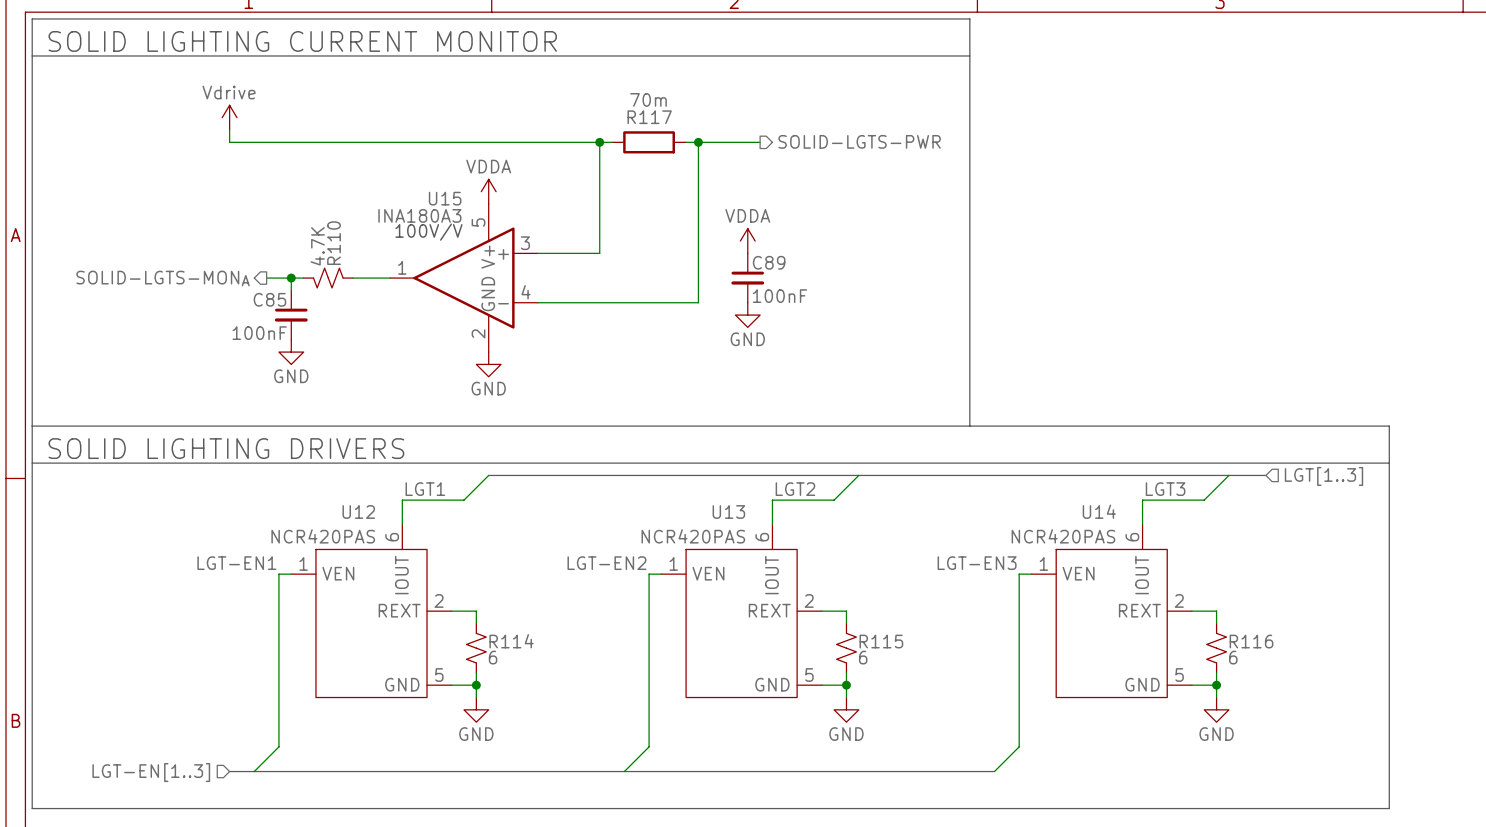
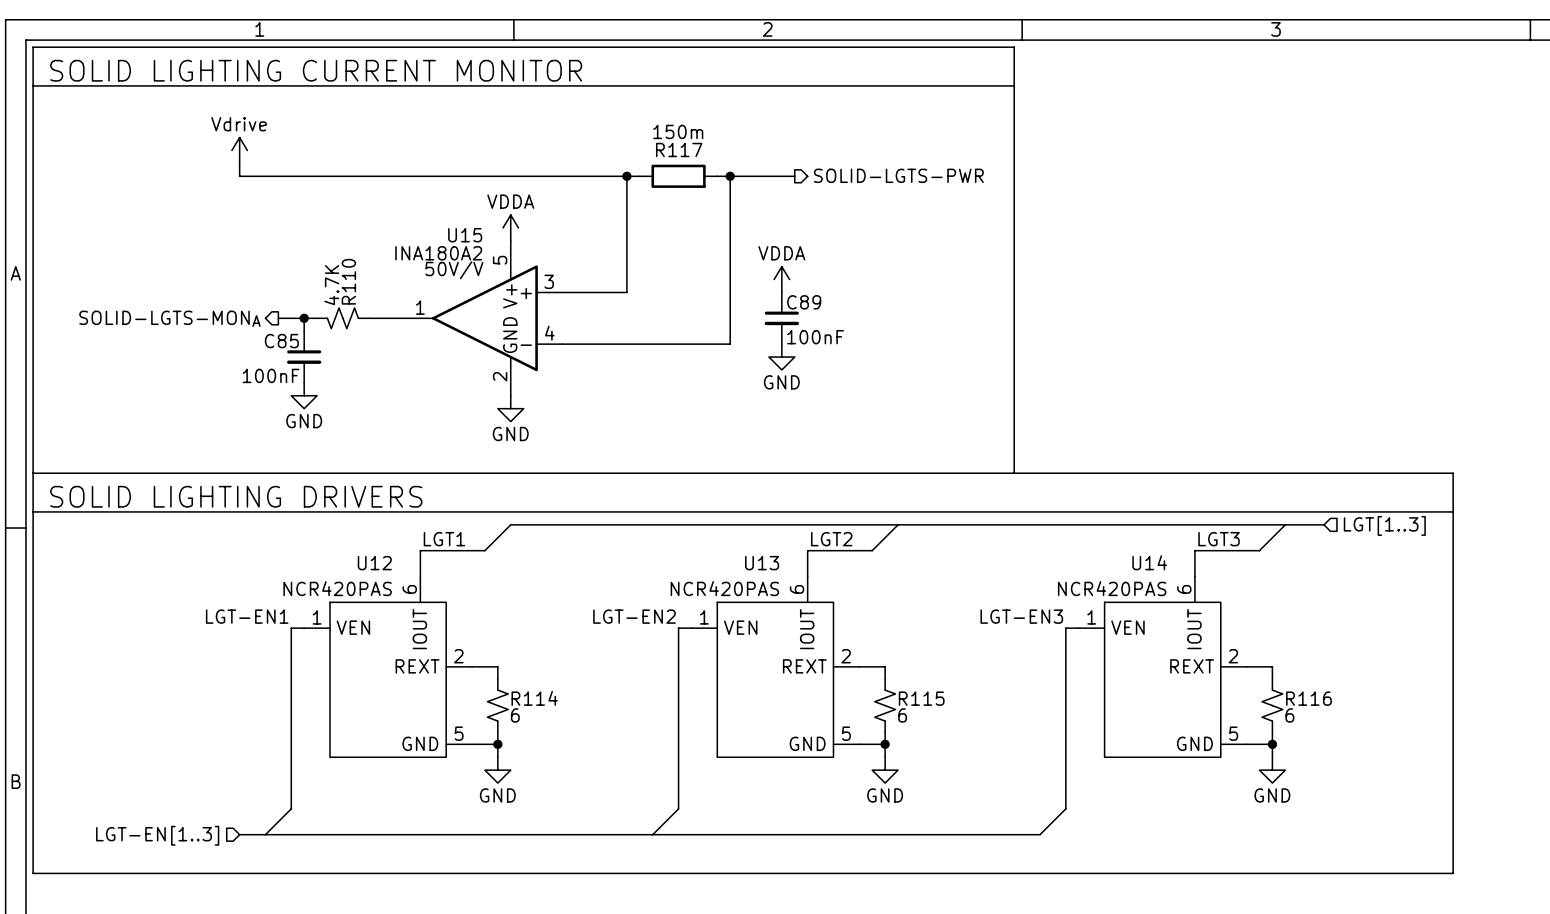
R117 value: 70m (648, 99) -> 150m (678, 131)
U15 value: INA180A3 (419, 215) -> INA180A2 (438, 253)
text: 100V/V (428, 232) -> 50V/V (454, 270)

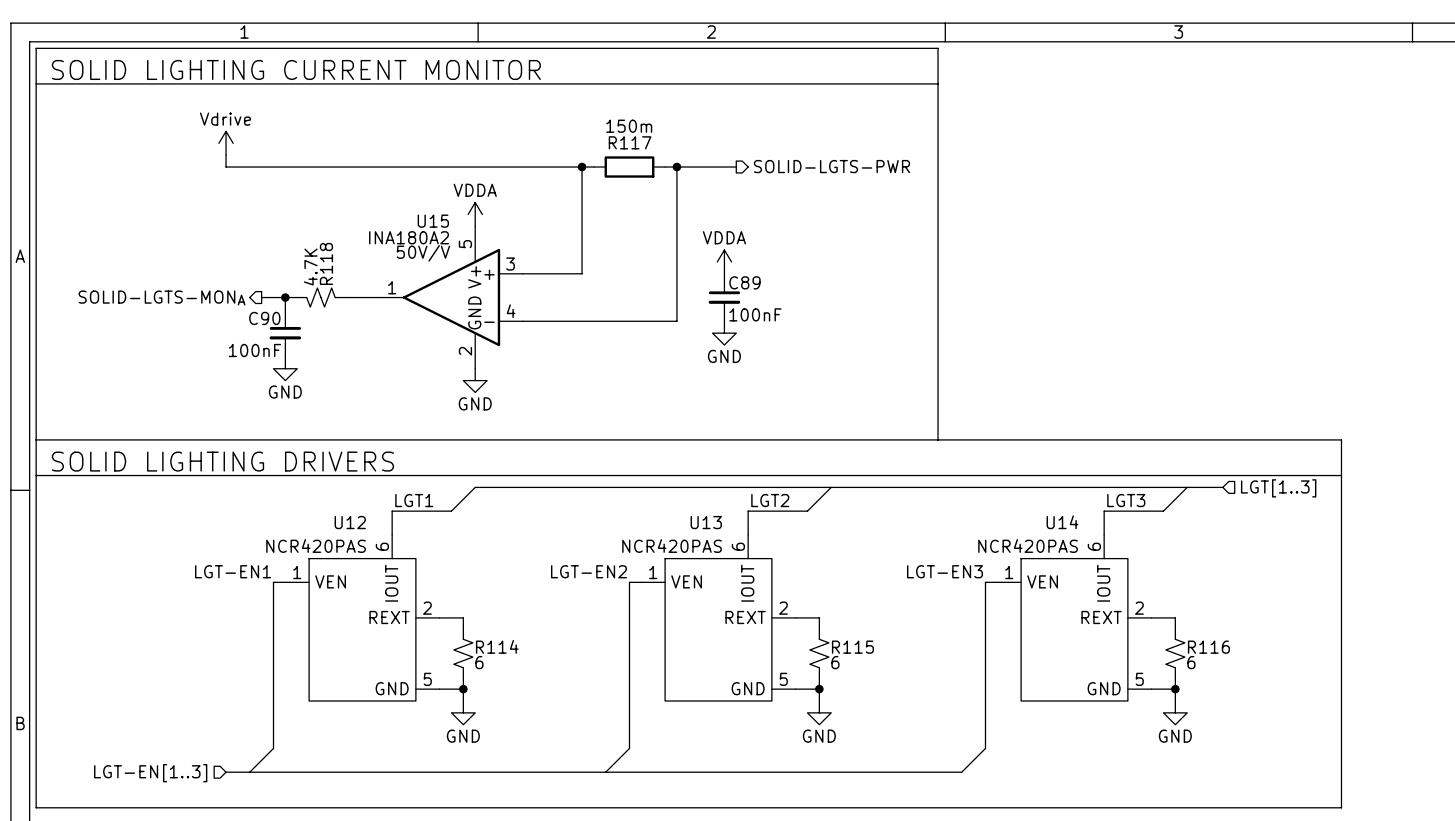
R110 name: R110 (348, 281) -> R118 (326, 263)
C85 name: C85 (281, 341) -> C90 (264, 318)

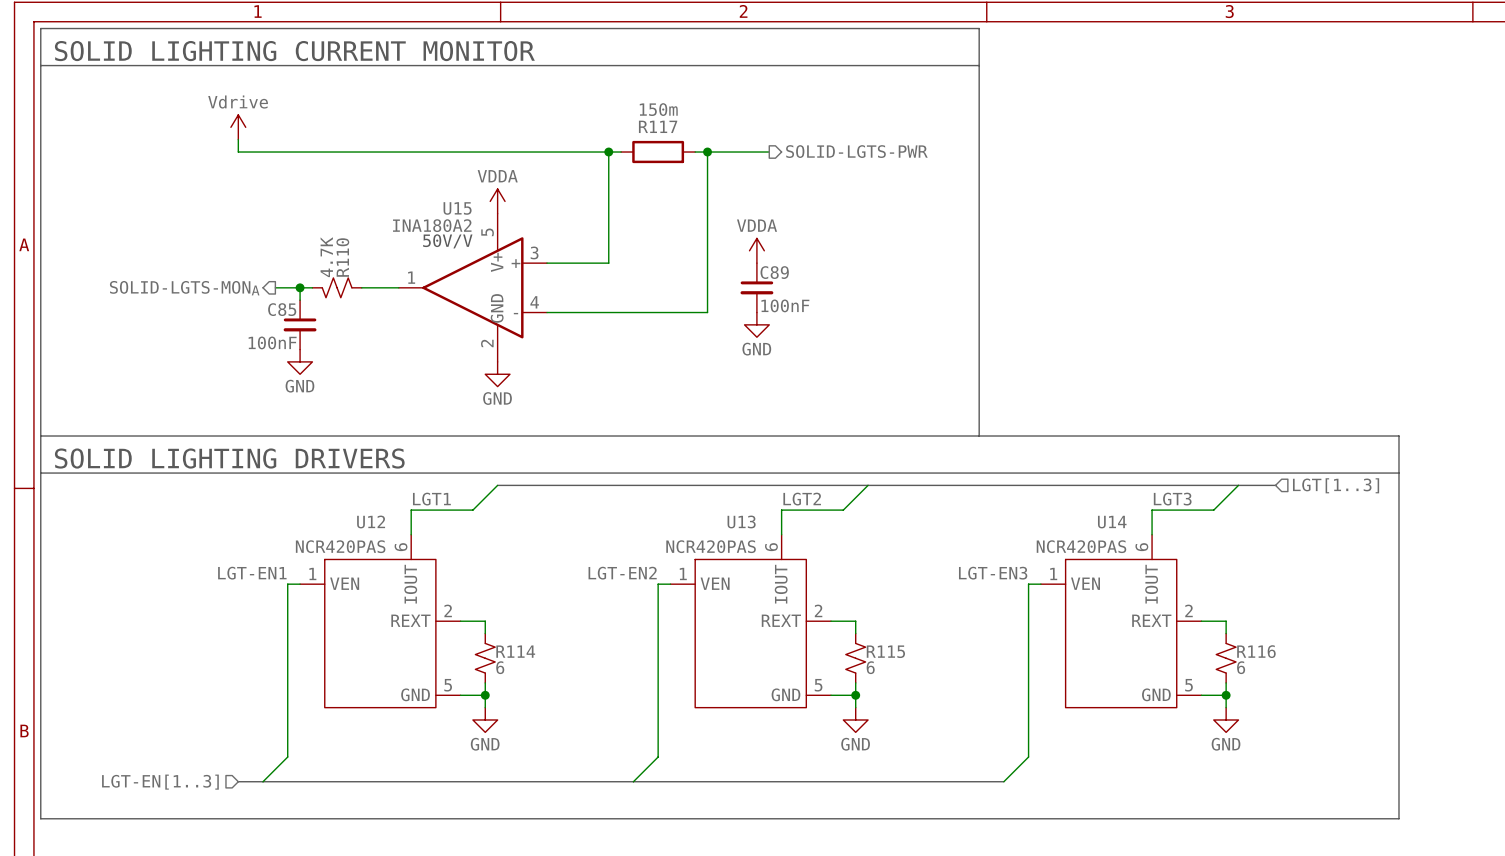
R118 name: R118 (326, 263) -> R110 (342, 257)
C90 name: C90 (264, 318) -> C85 (282, 309)

